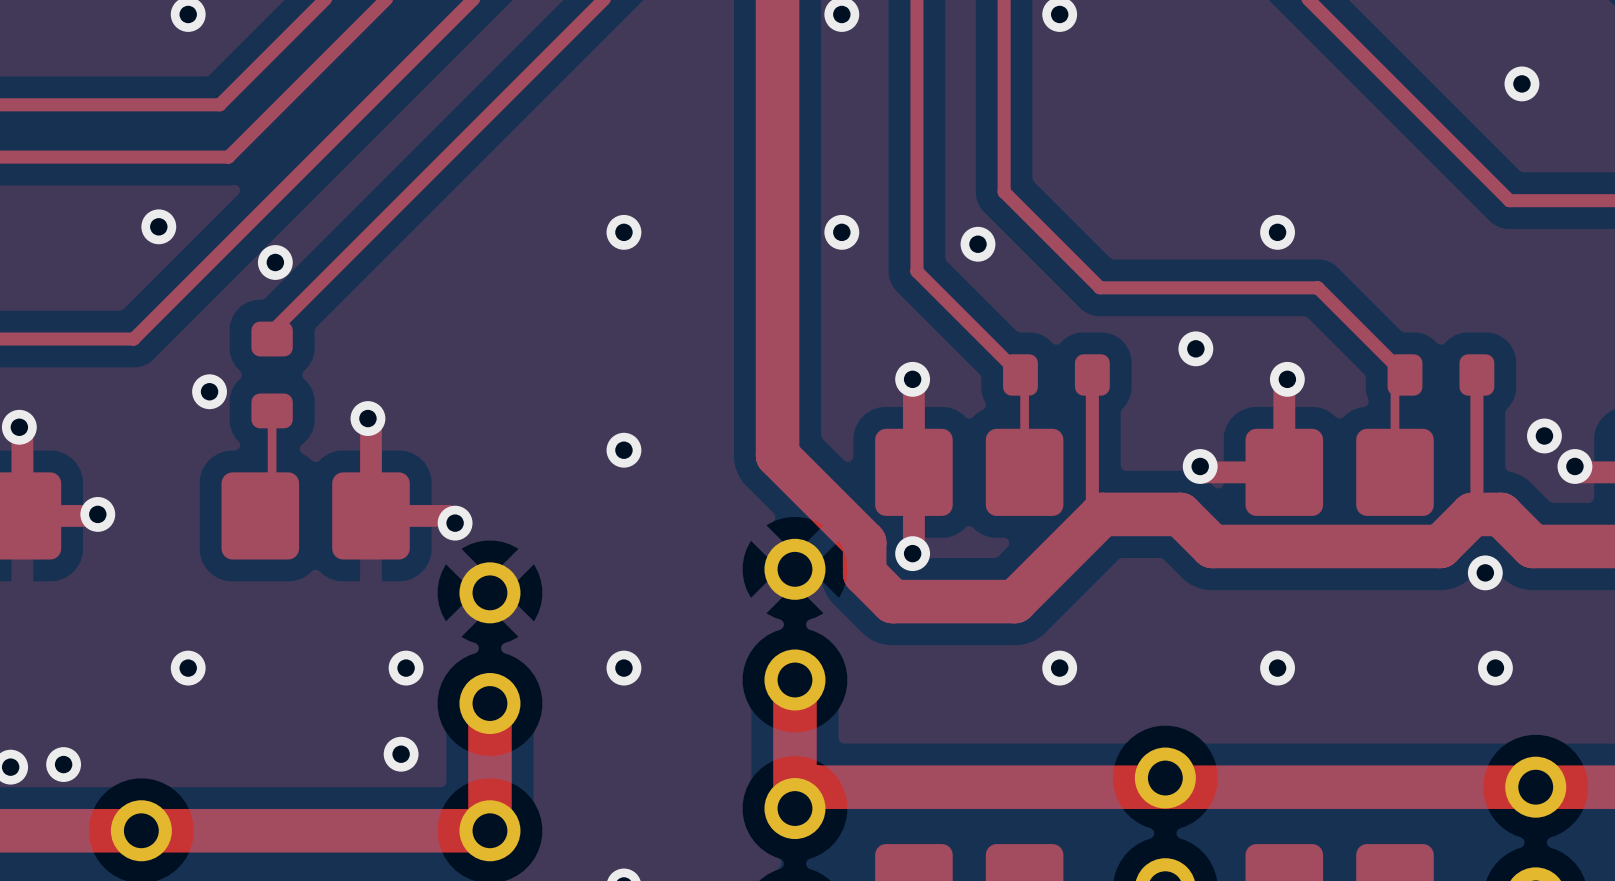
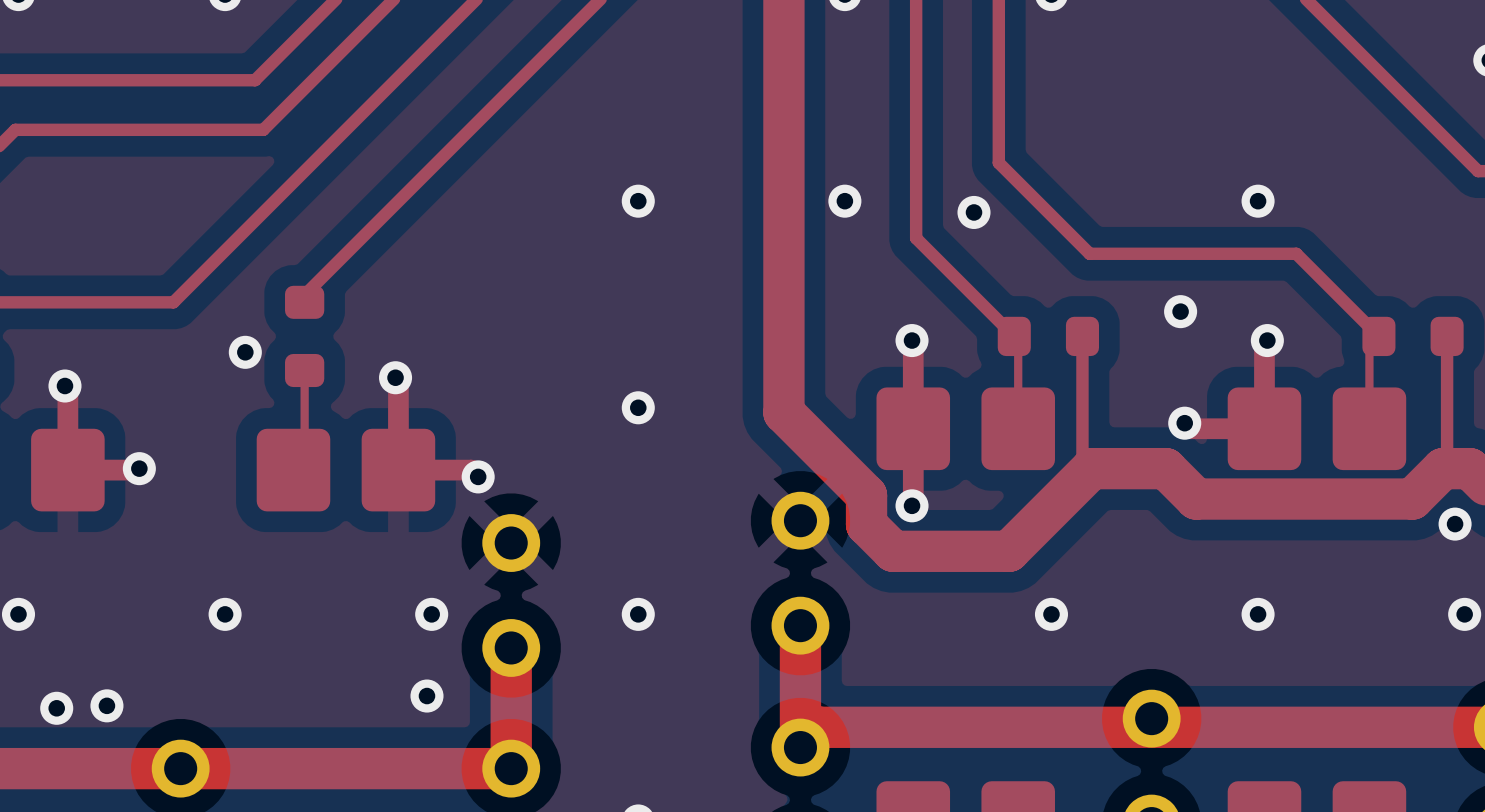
via: (158, 226) -> none
via: (275, 262) -> none

